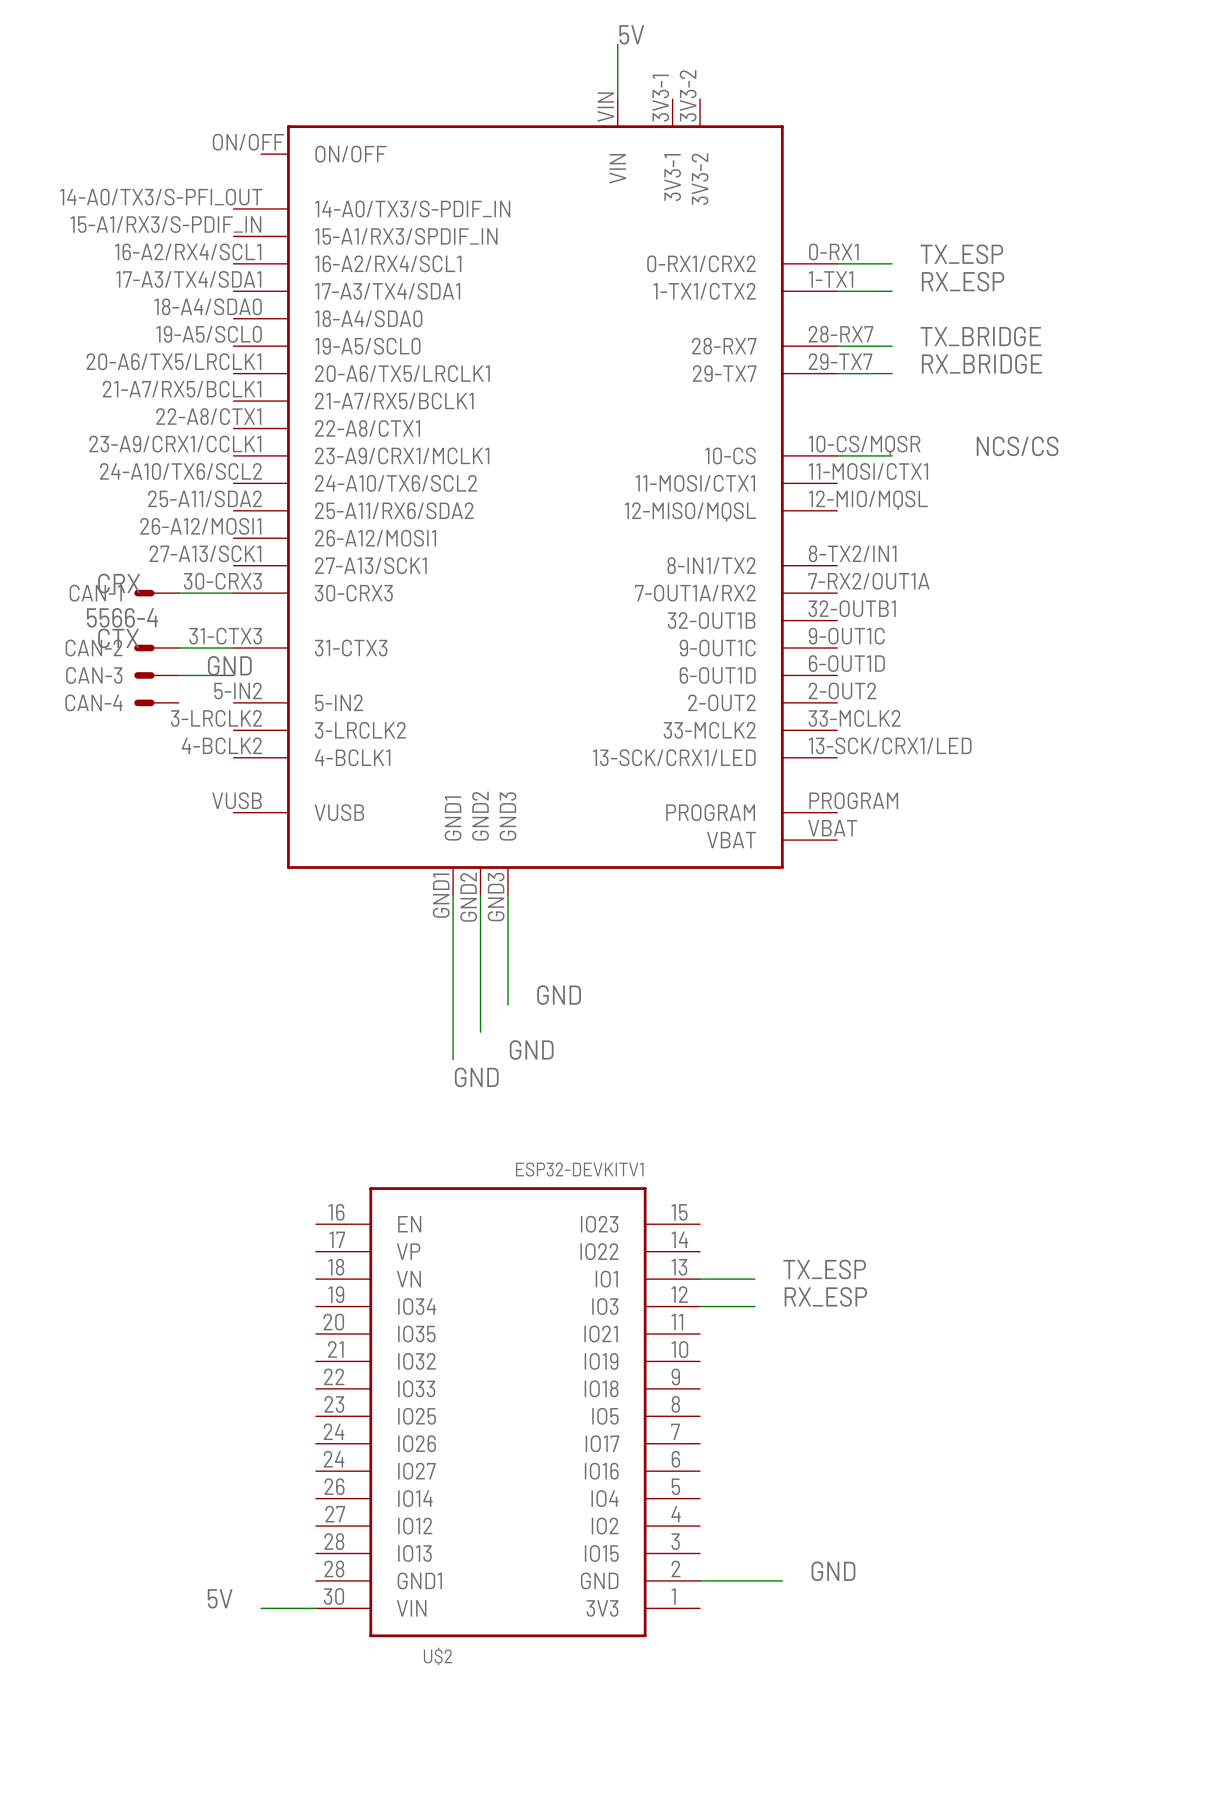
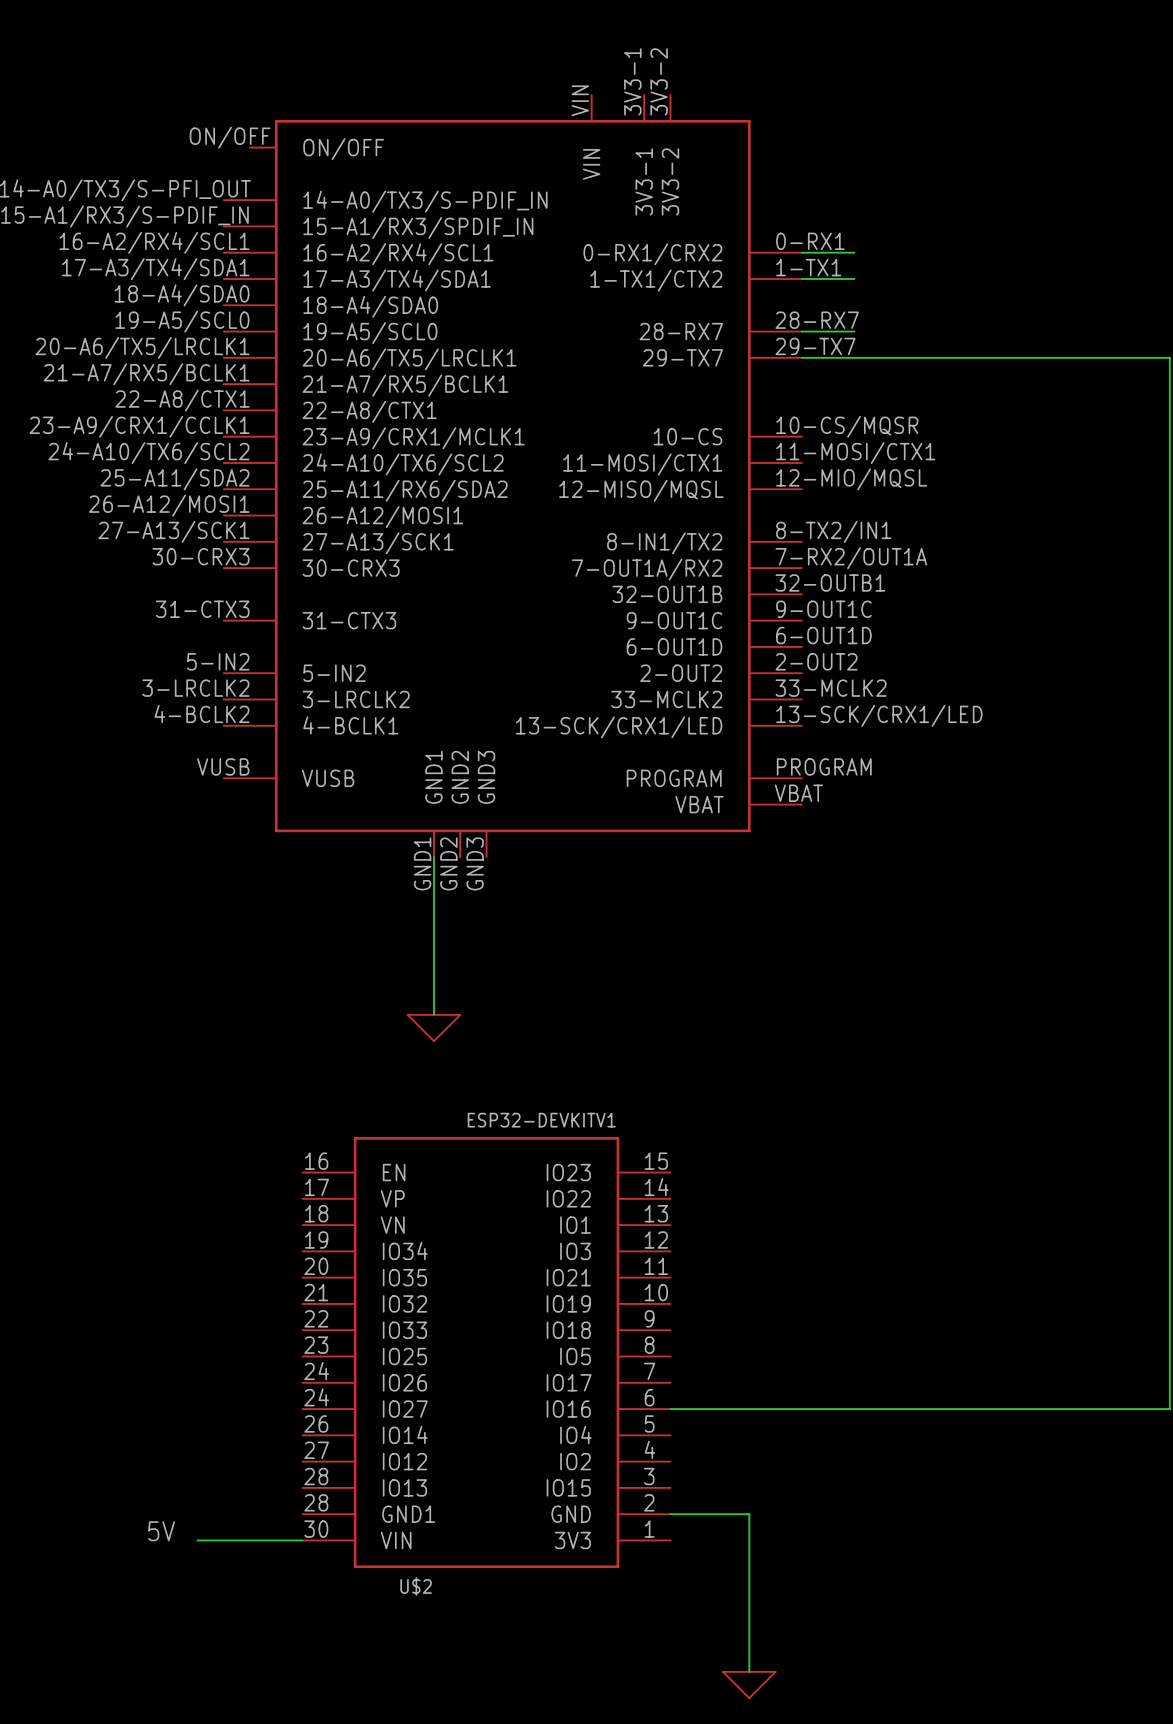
label: 5V (631, 34) -> none
wire: (617, 44) (617, 99) -> none
label: TX_ESP (961, 254) -> none
label: RX_ESP (963, 281) -> none
label: TX_BRIDGE (980, 336) -> none
label: RX_BRIDGE (981, 364) -> none
wire: none -> (854, 357) (1169, 357) (1169, 1409) (670, 1409)
label: NCS/CS (1017, 446) -> none
wire: (837, 455) (892, 455) -> none
label: CRX (119, 583) -> none
CAN-1: 5566-4 (156, 593) -> none
wire: (178, 593) (233, 593) -> none
label: CTX (118, 638) -> none
CAN-2: (156, 648) -> none
wire: (178, 648) (233, 648) -> none
label: GND (229, 665) -> none
CAN-3: (156, 675) -> none
wire: (178, 675) (233, 675) -> none
CAN-4: (156, 702) -> none
wire: (480, 894) (480, 1032) -> none
wire: (507, 894) (507, 1004) -> none
label: GND (559, 995) -> none
label: GND (531, 1049) -> none
power symbol: none -> (433, 1028)
label: GND (476, 1077) -> none
label: TX_ESP (824, 1269) -> none
wire: (700, 1279) (754, 1279) -> none
label: RX_ESP (825, 1296) -> none
wire: (700, 1306) (754, 1306) -> none
label: GND (833, 1571) -> none
wire: none -> (749, 1514) (749, 1671)
label position: 5V (220, 1598) -> 5V (161, 1531)
wire: none -> (197, 1540) (249, 1540)
power symbol: none -> (749, 1685)

